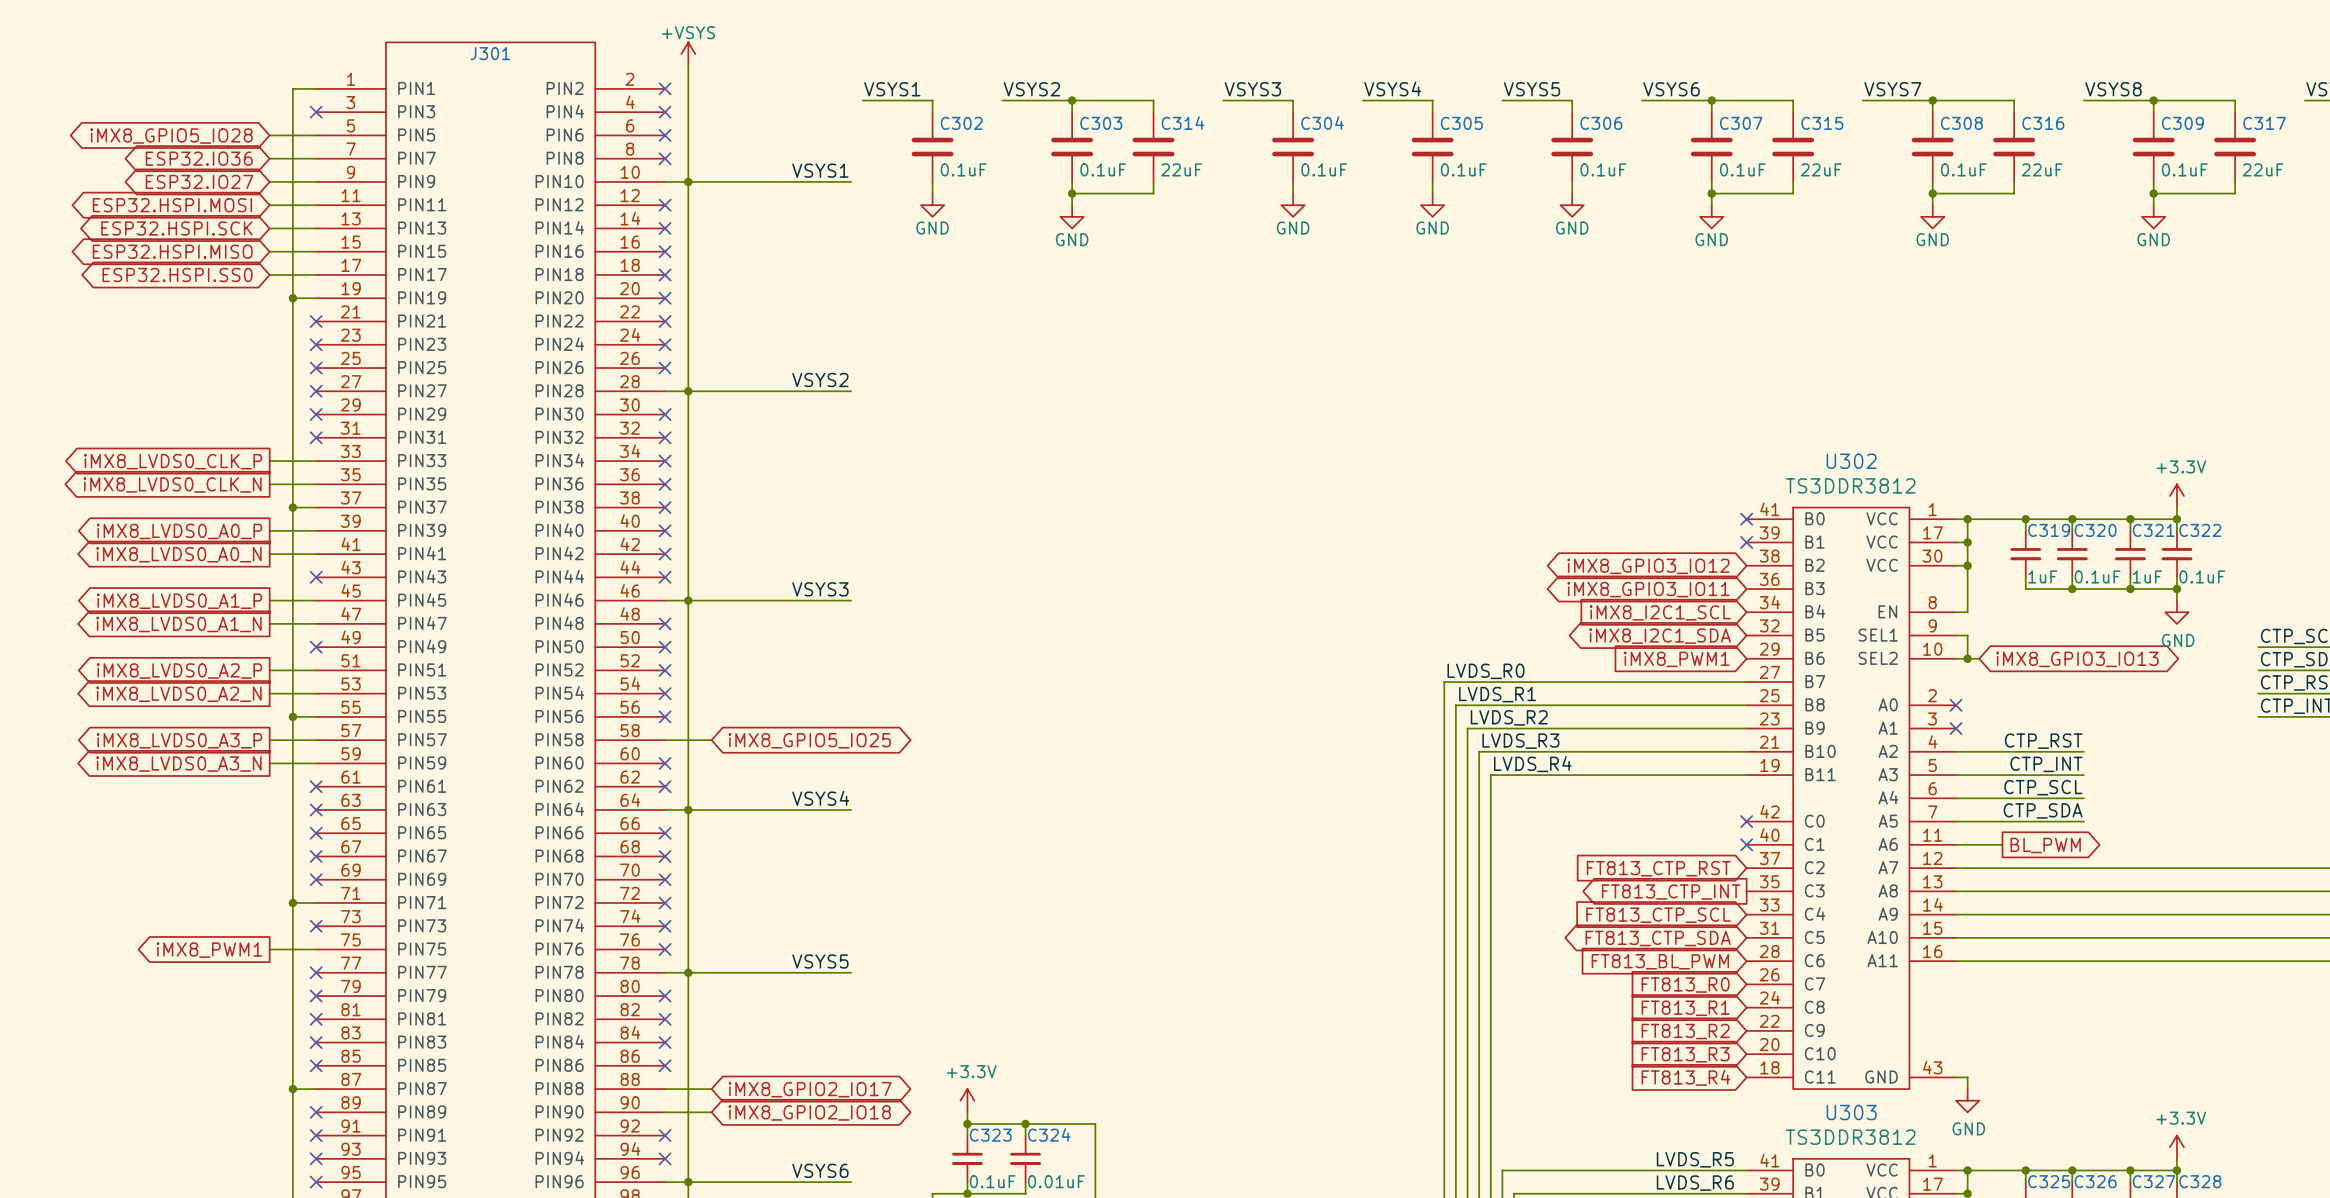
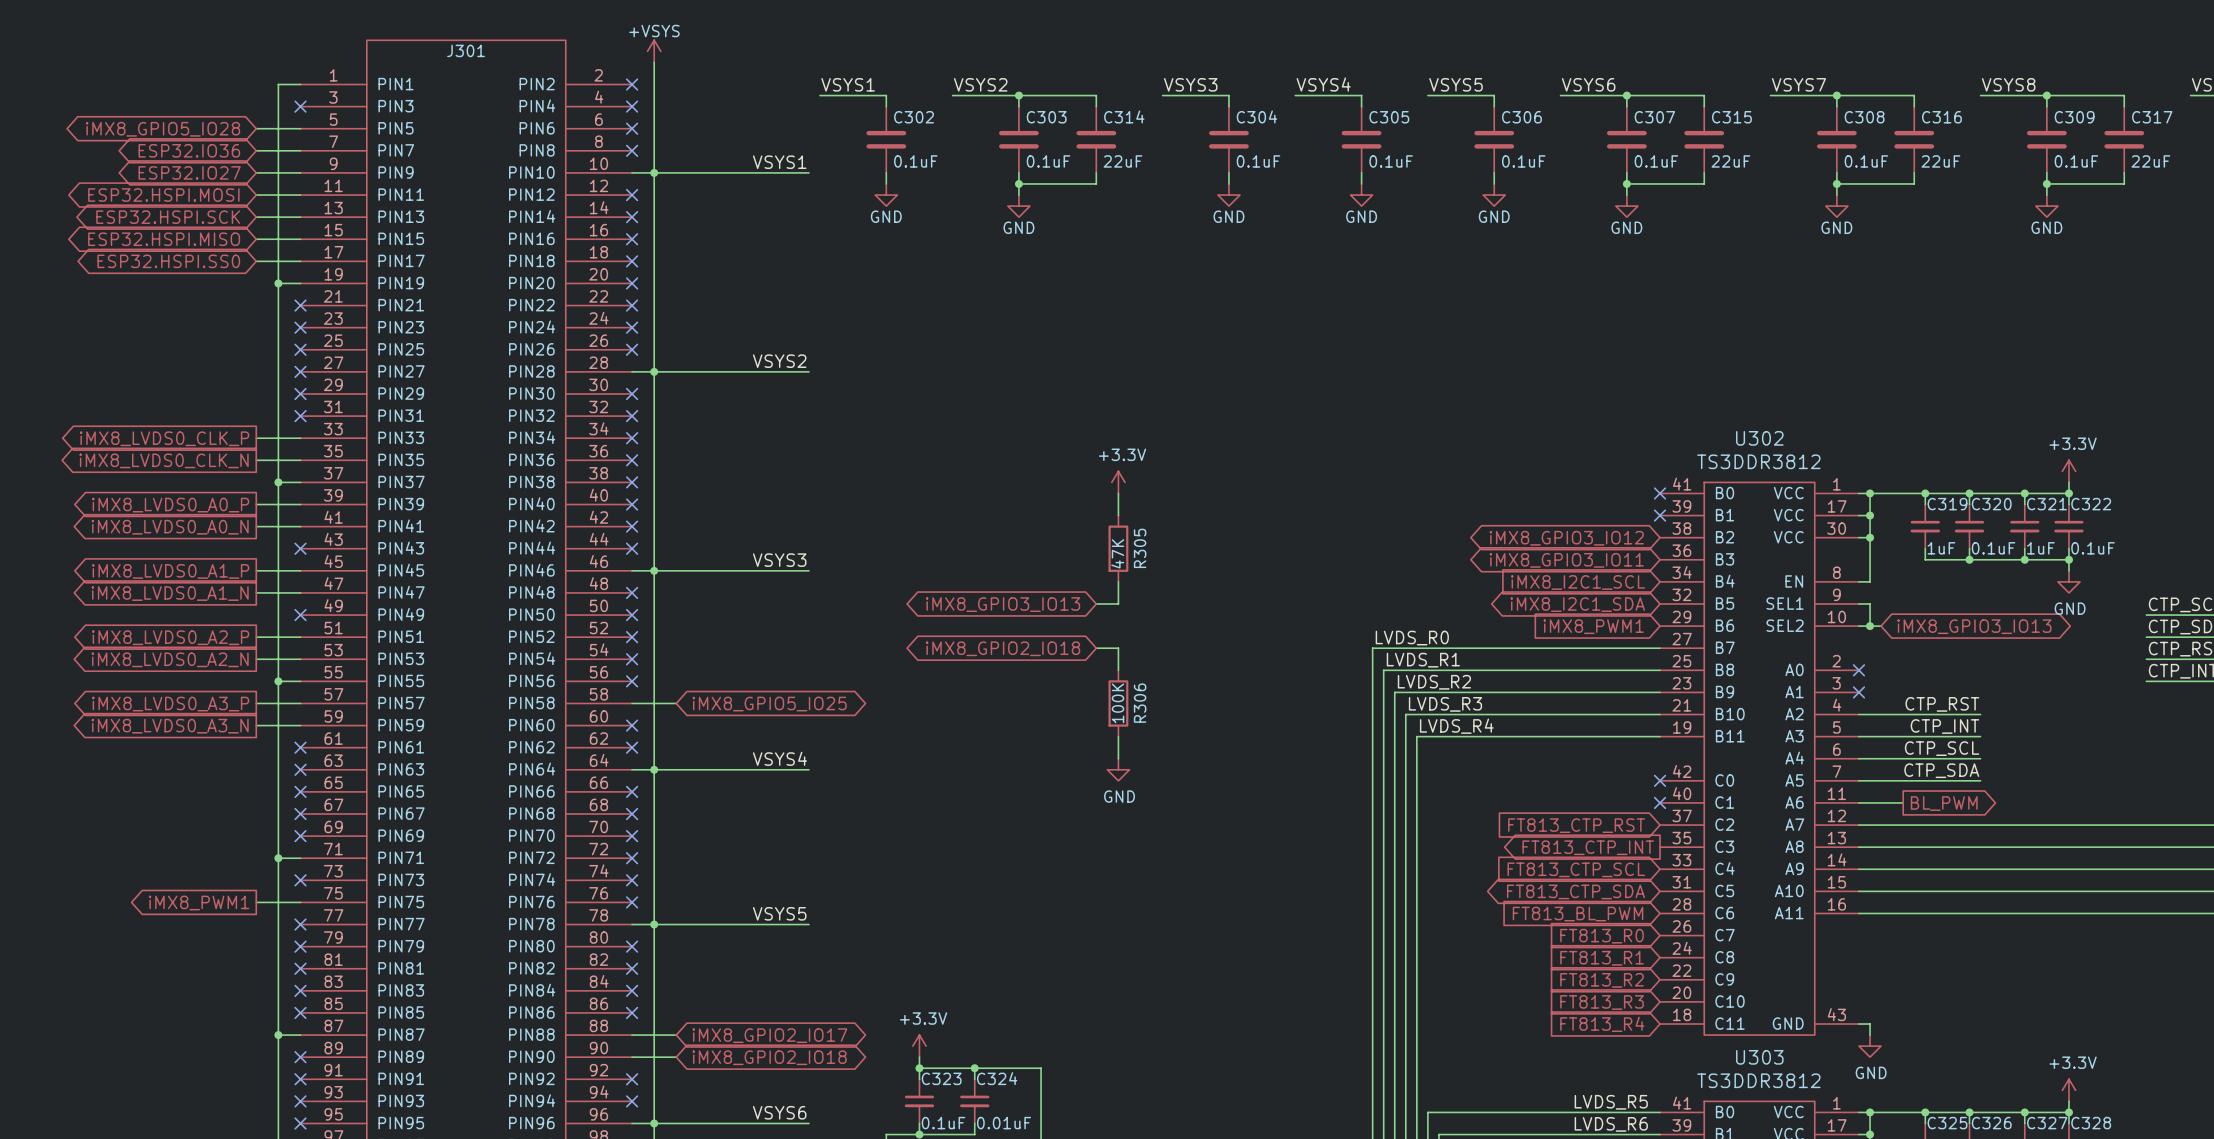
power symbol: none -> +3.3V (1118, 482)
wire: none -> (1118, 493) (1118, 515)
R305: none -> 47K (1118, 548)
wire: none -> (1118, 581) (1118, 603) (1096, 603)
global label: none -> iMX8_GPIO3_IO13 (1003, 604)
global label: none -> iMX8_GPIO2_IO18 (1003, 648)
wire: none -> (1096, 648) (1118, 648) (1118, 670)
R306: none -> 100K (1118, 703)
wire: none -> (1118, 736) (1118, 758)
power symbol: none -> GND (1118, 769)

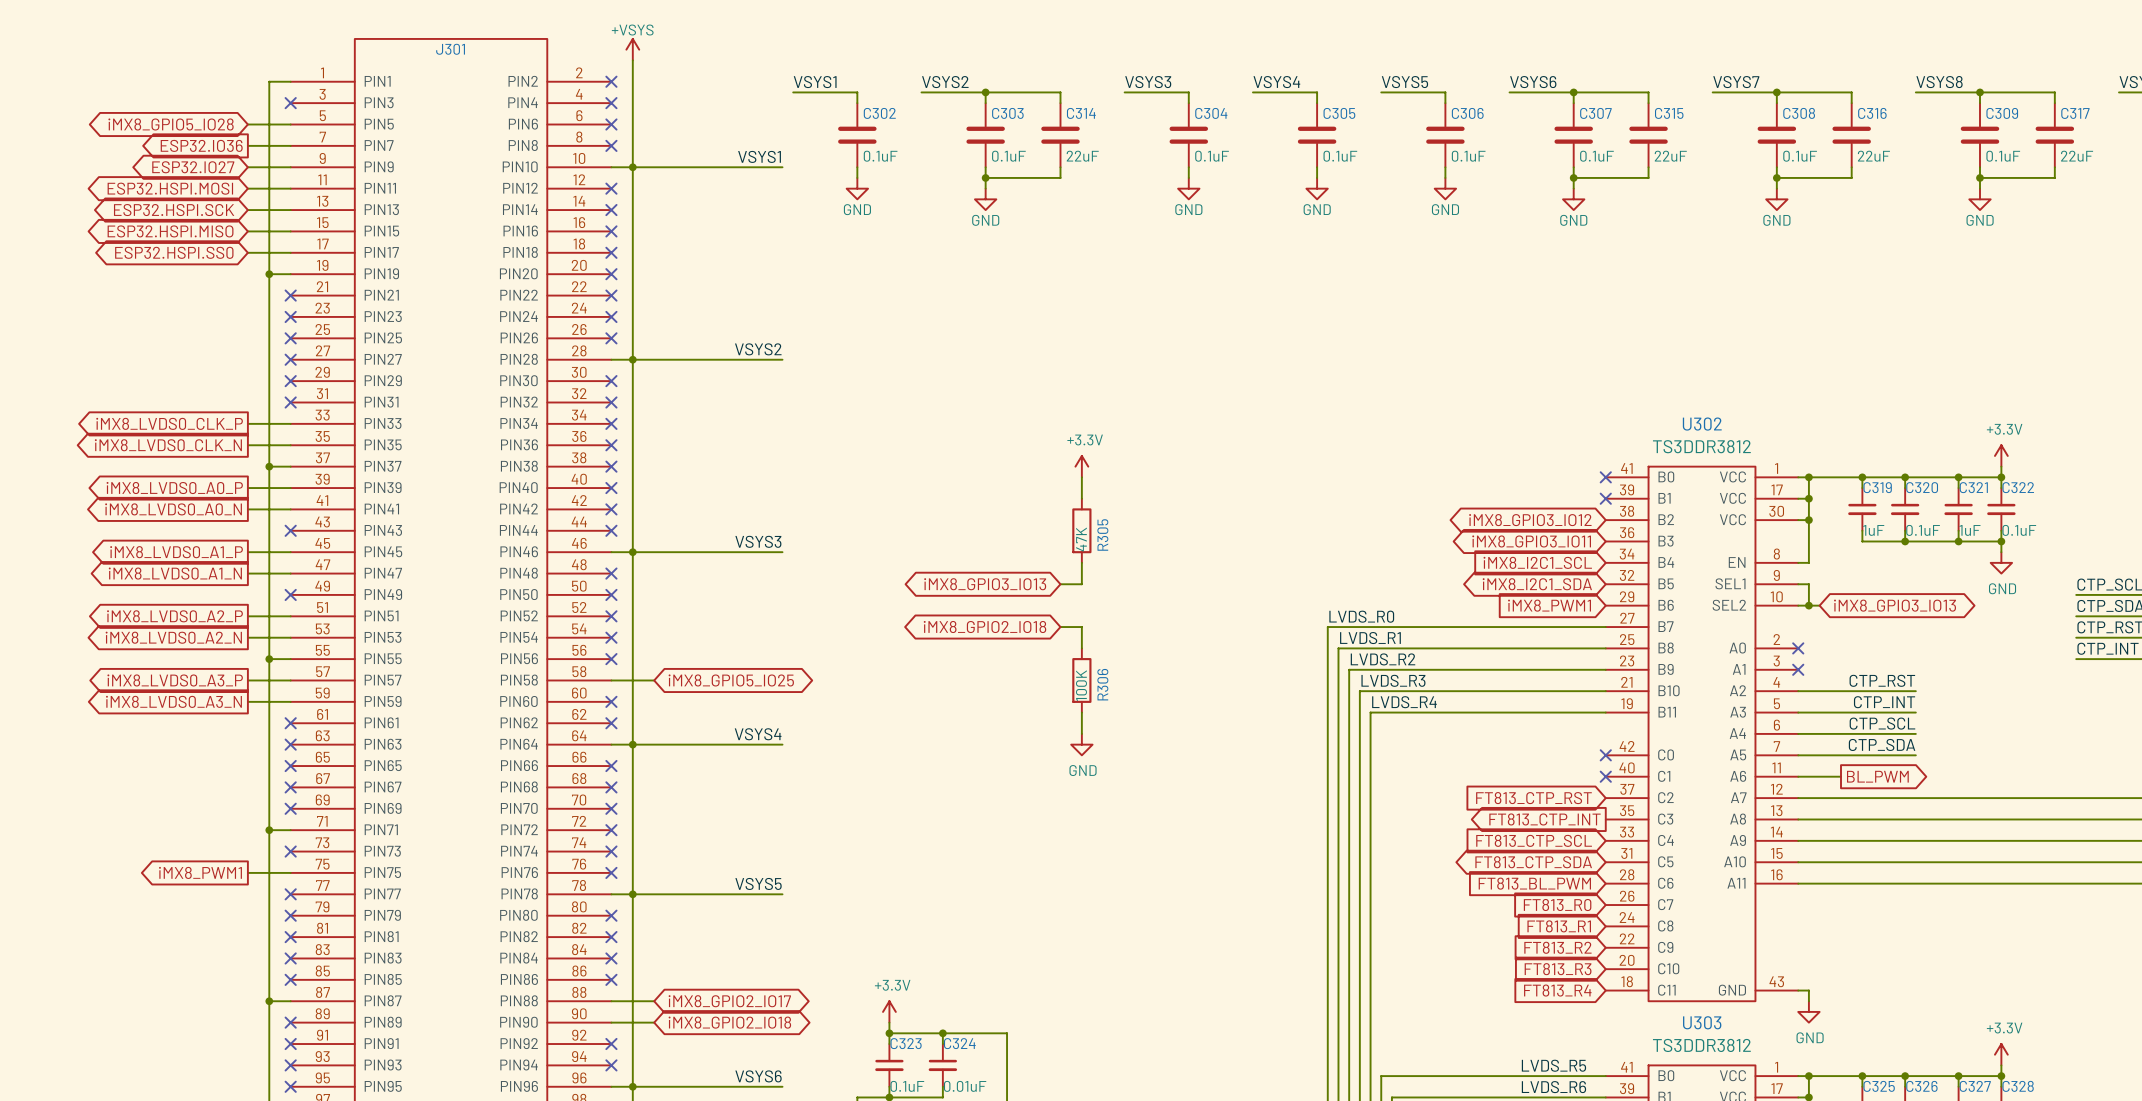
global label shape: bidirectional (189, 150) -> output (201, 145)

